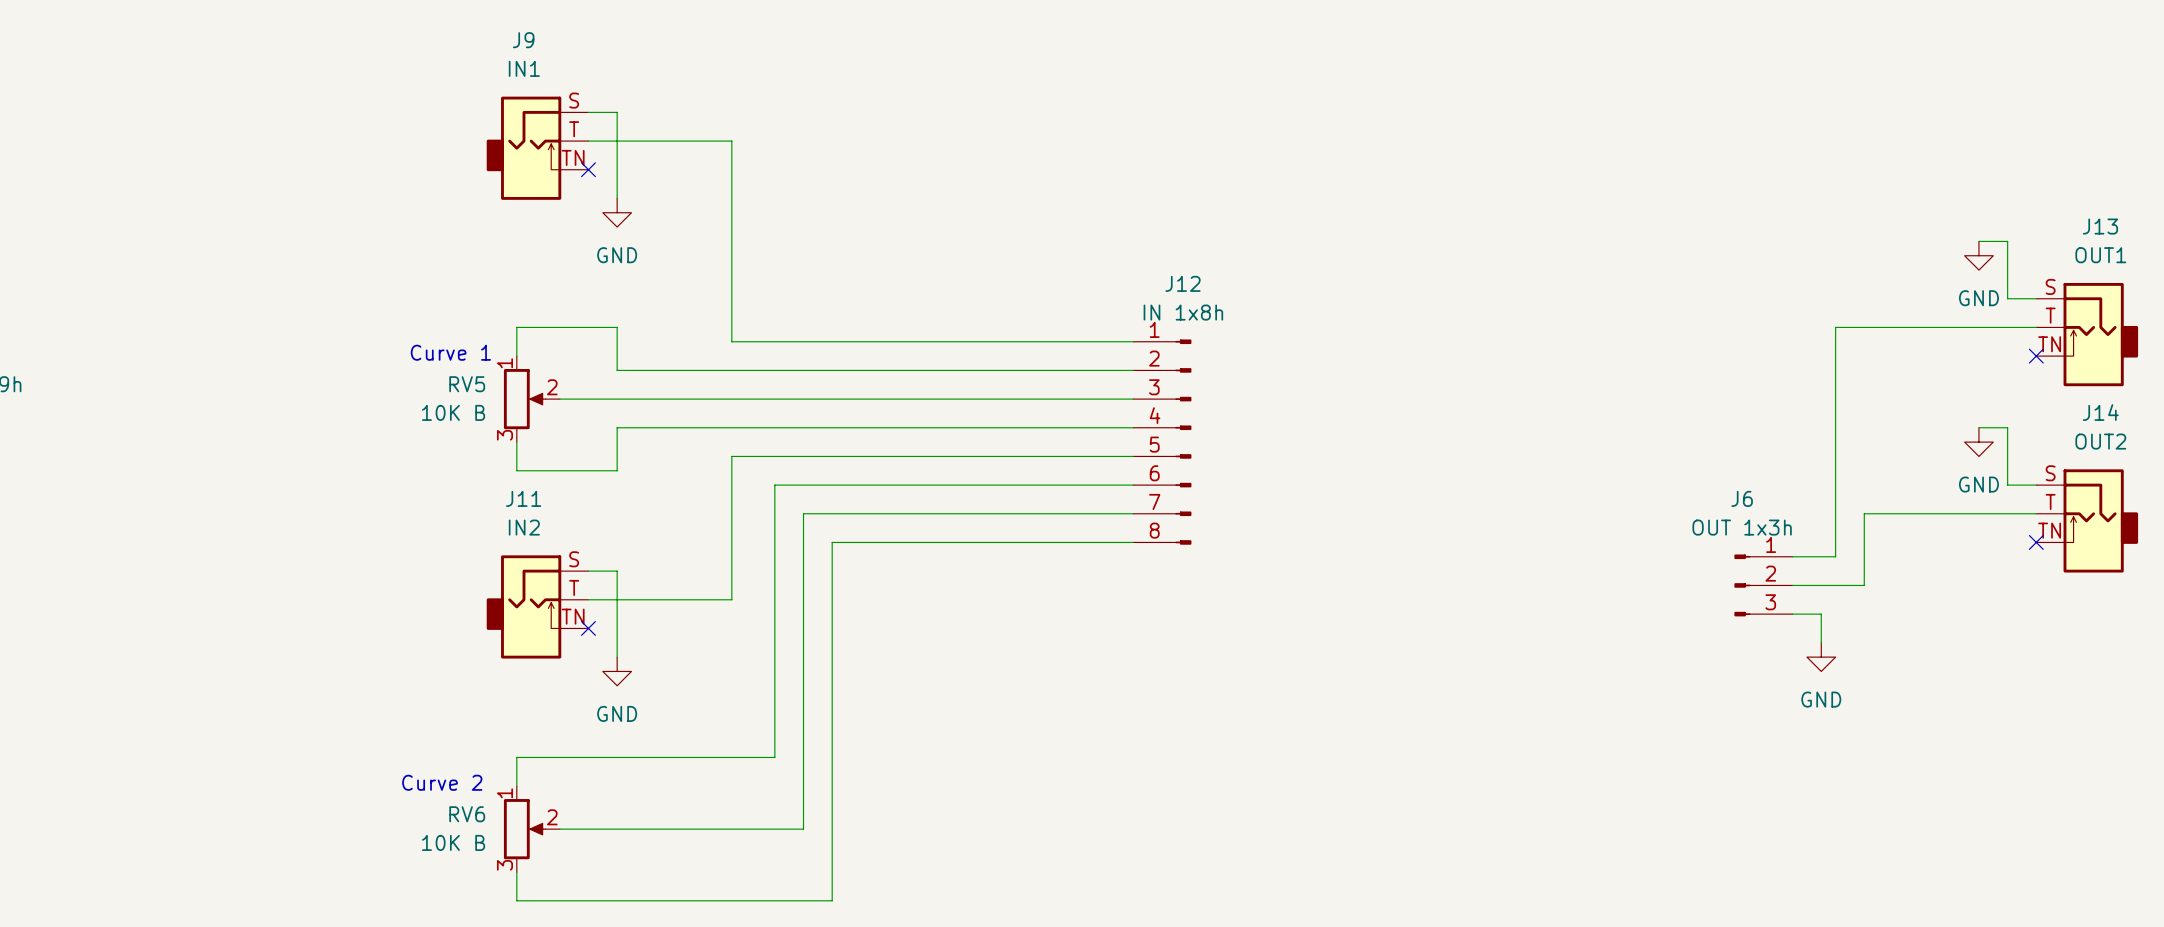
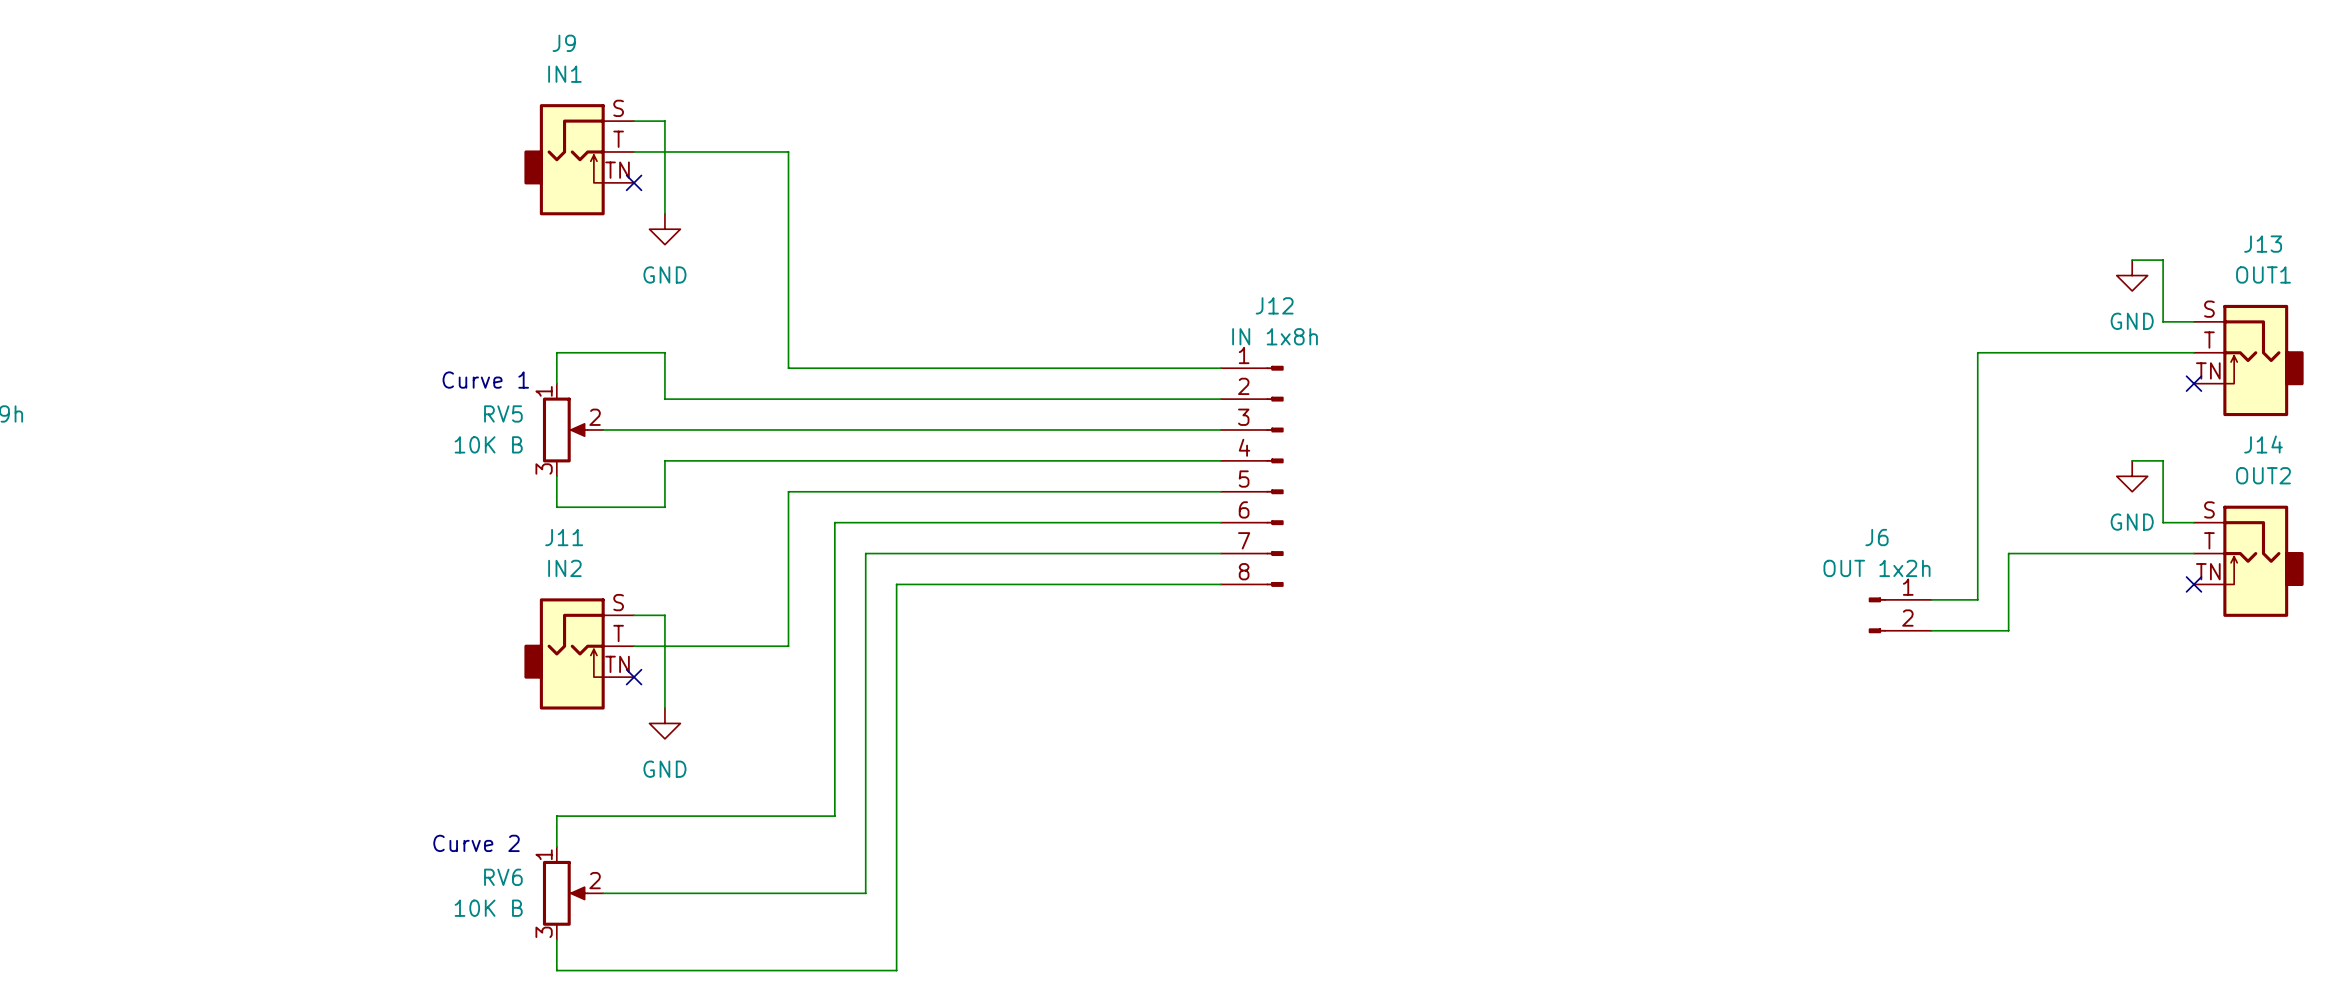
J6 value: OUT 1x3h (1742, 527) -> OUT 1x2h (1876, 568)
J6 symbol: [1734, 554, 1793, 617] -> [1868, 597, 1932, 634]
wire: (1792, 614) (1821, 614) (1821, 642) -> none
power symbol: GND (1821, 657) -> none

